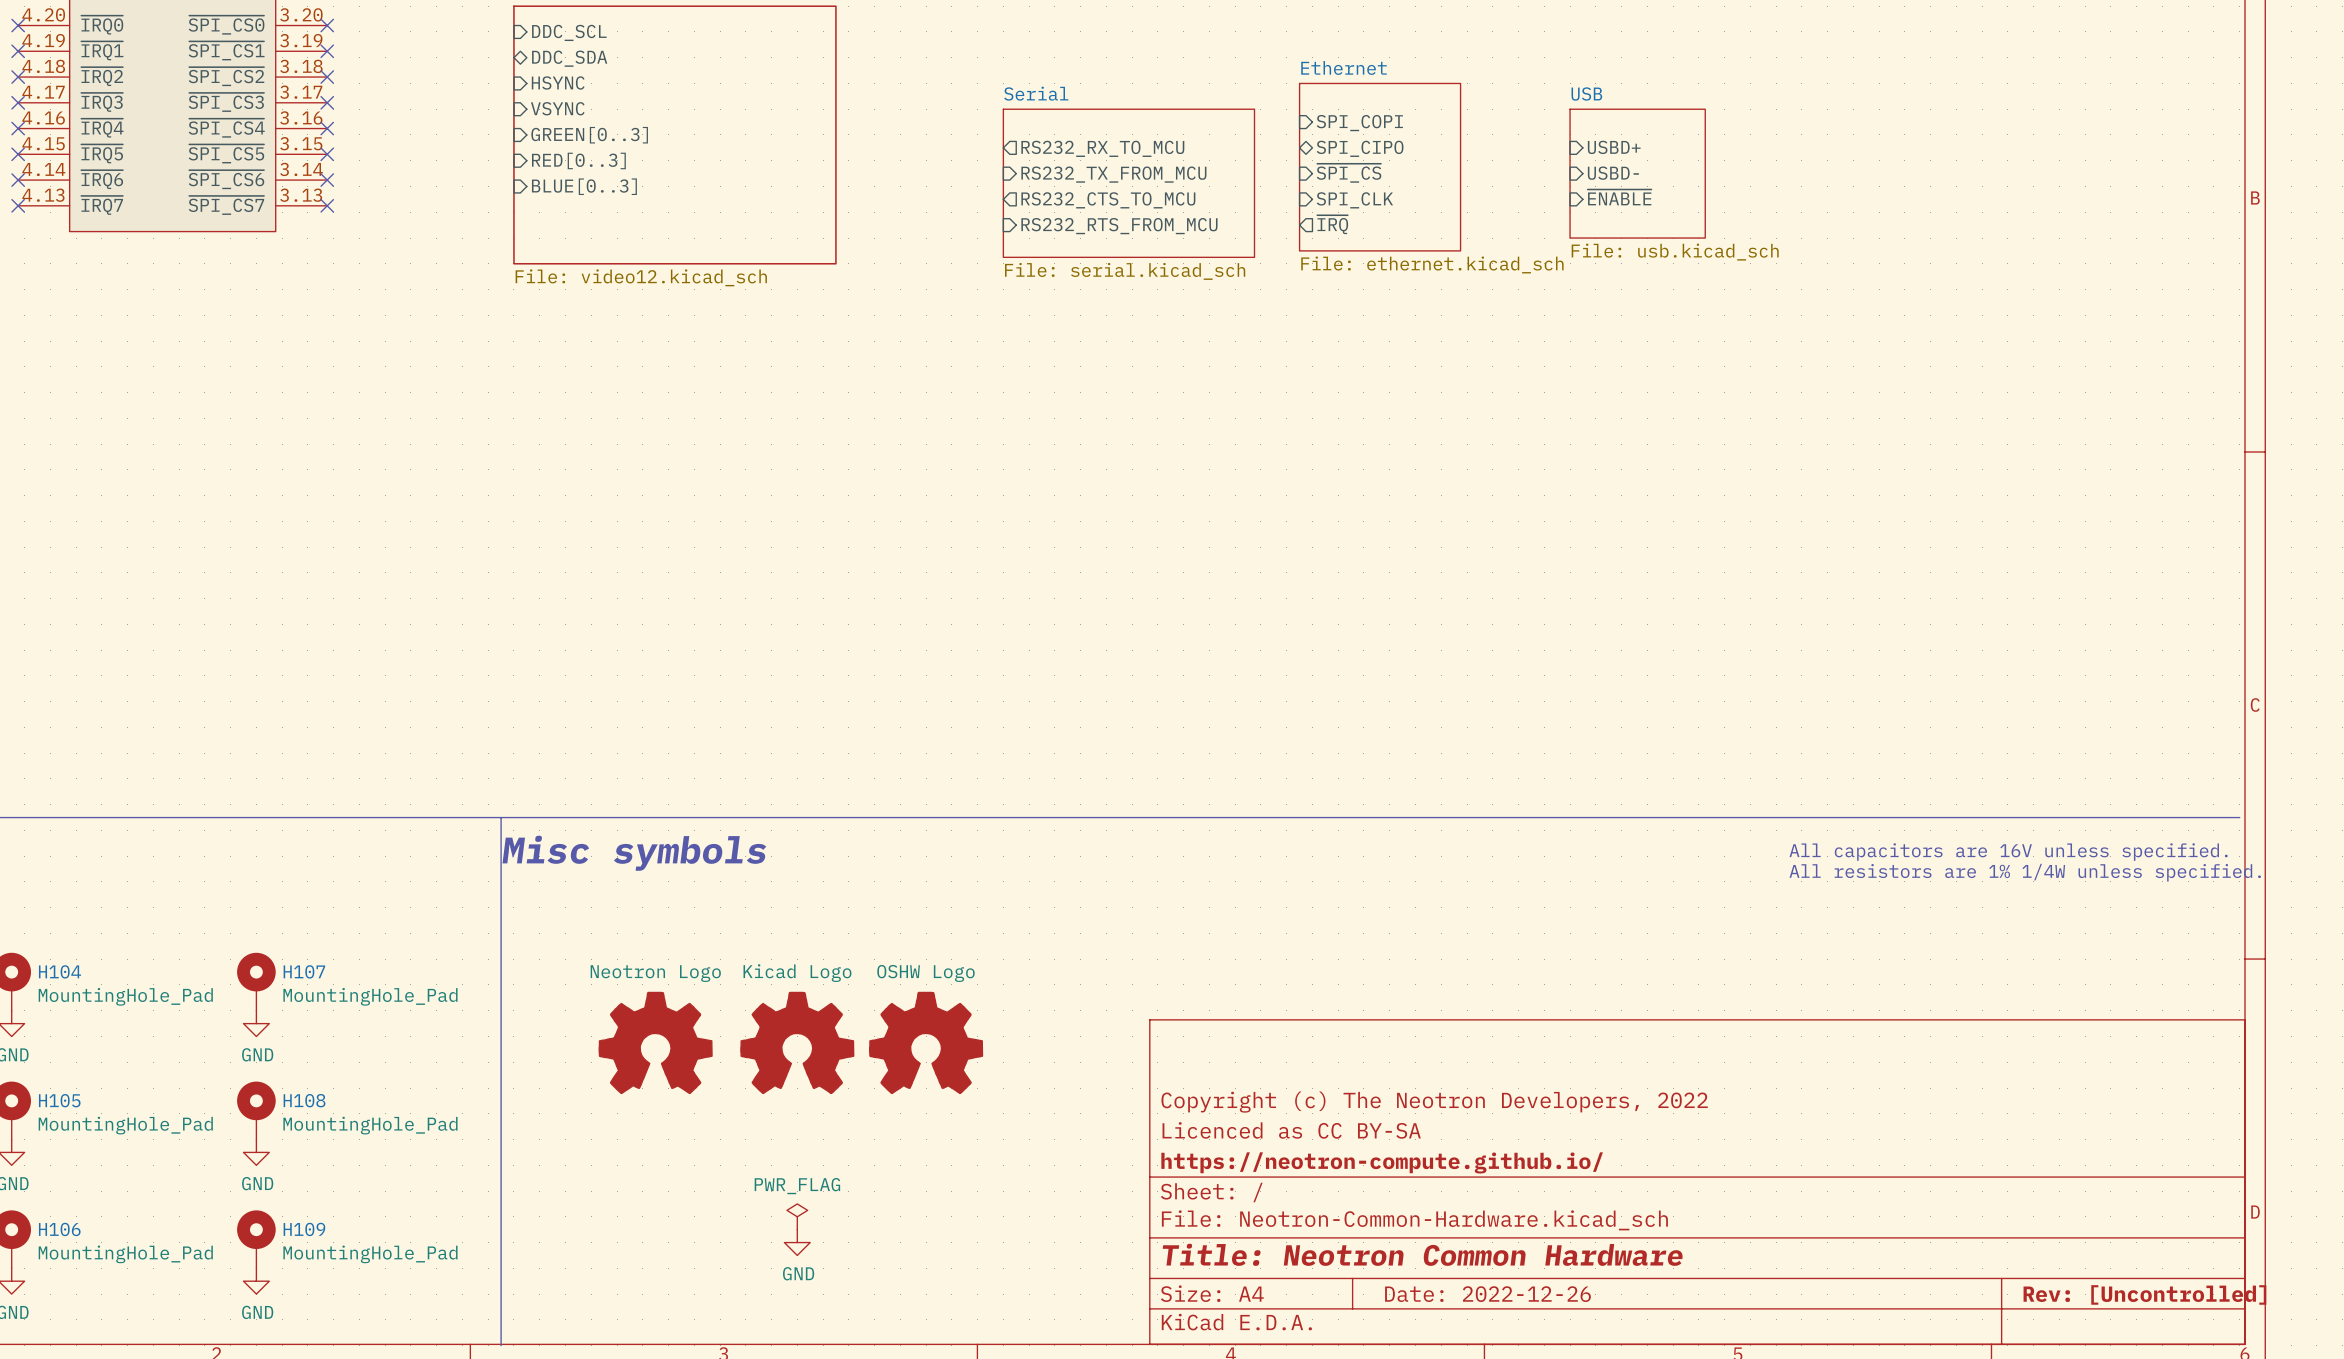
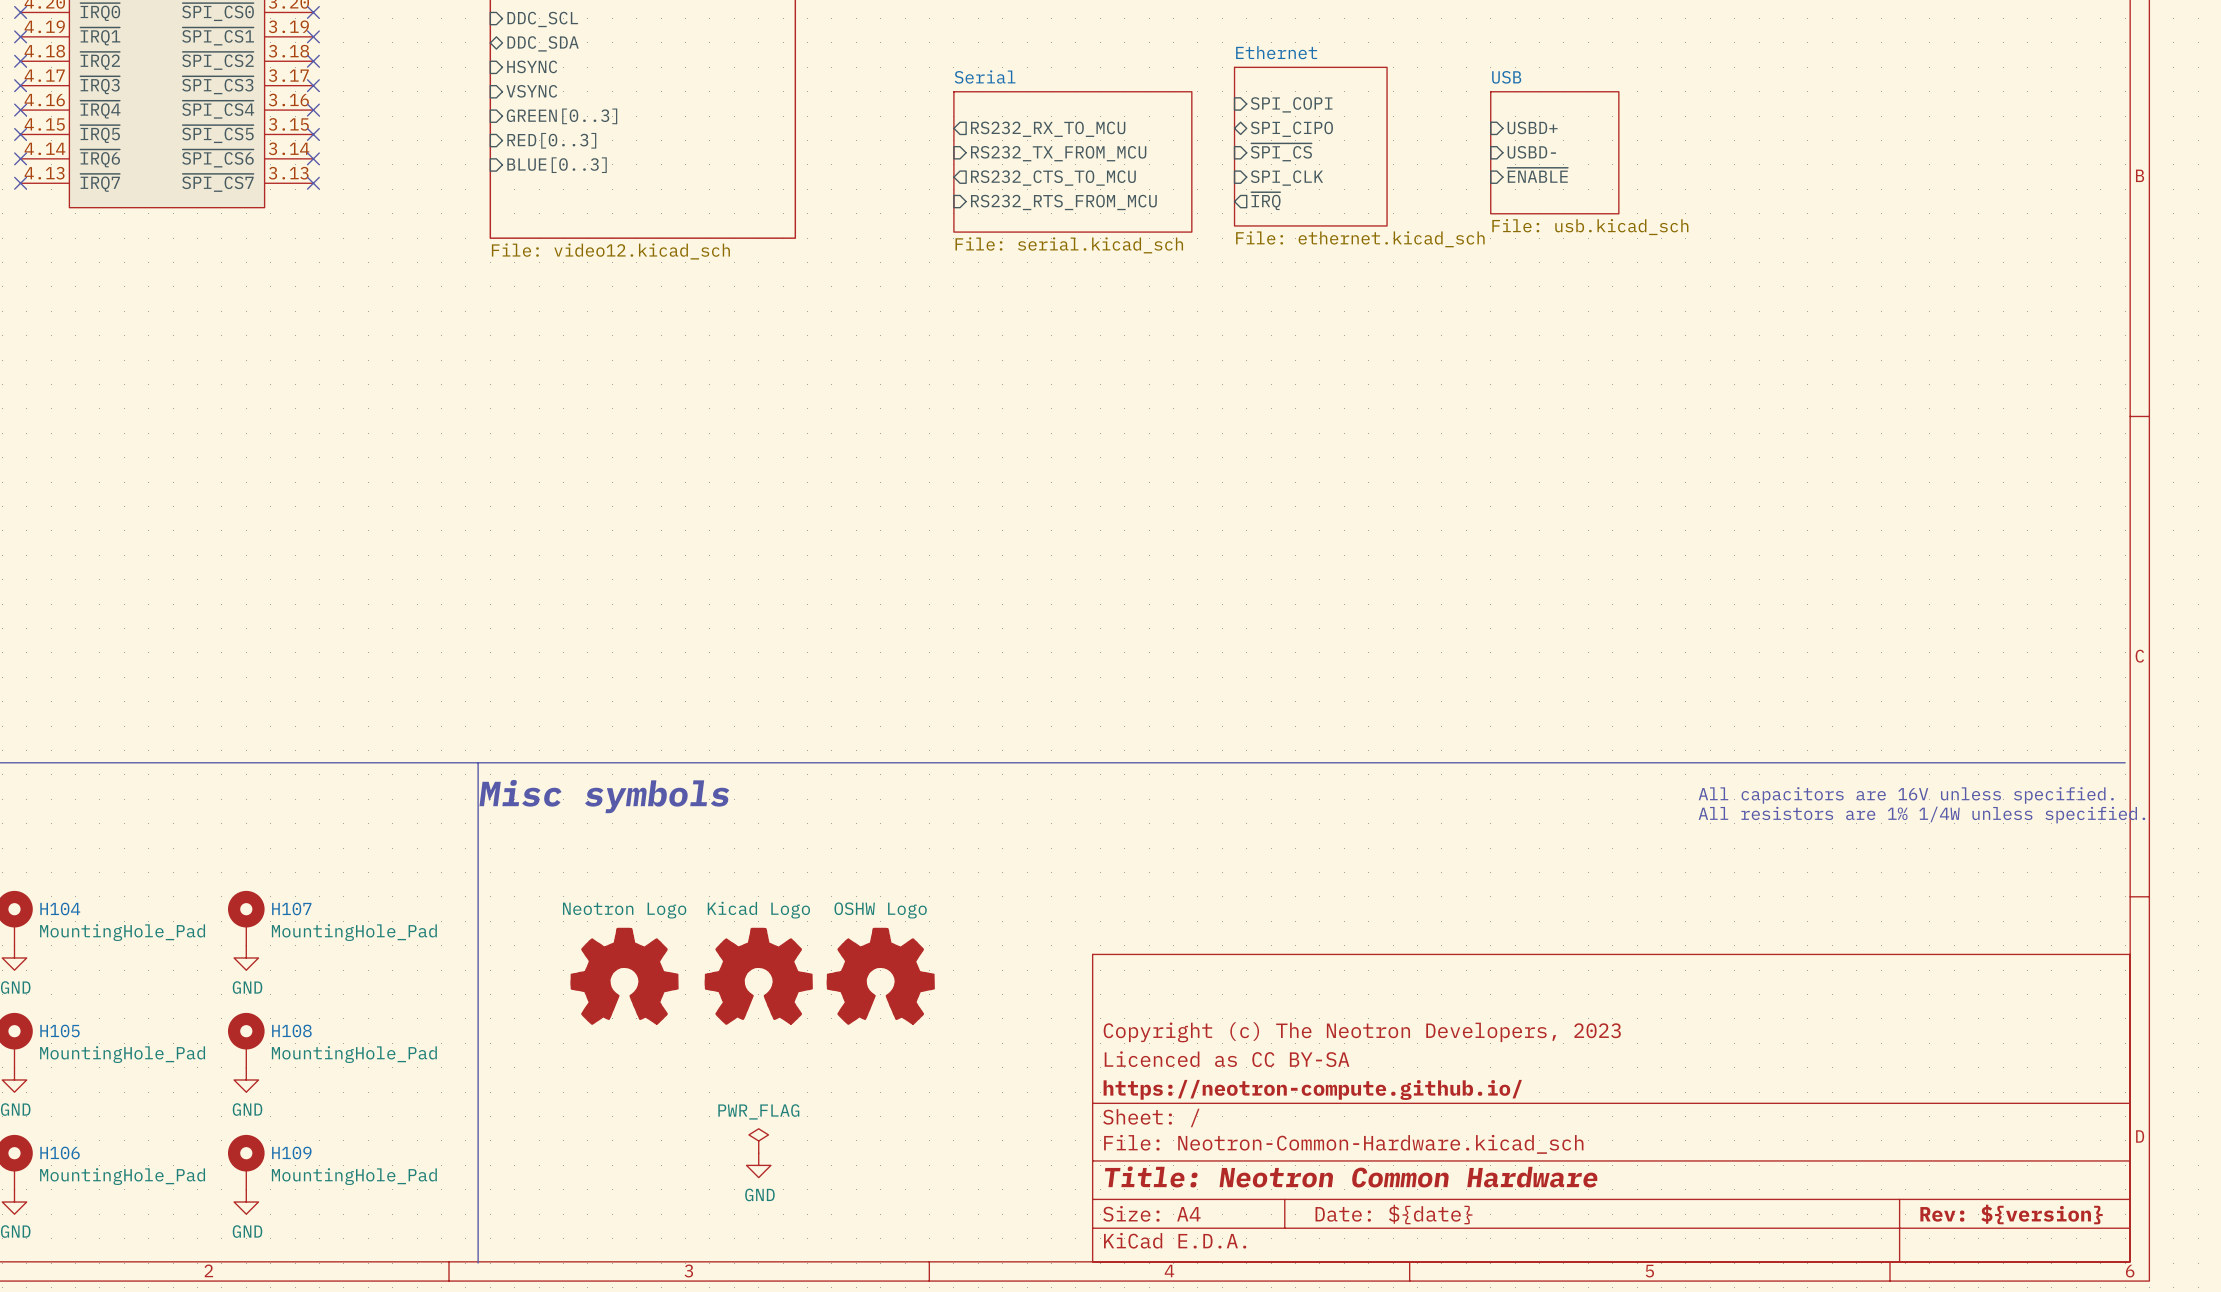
title block: Copyright (c) The Neotron Developers, 2022 (1434, 1102) -> Copyright (c) The Neotron Developers, 2023 (1362, 1032)
title block: Date: 2022-12-26 (1487, 1294) -> Date: ${date} (1394, 1214)
title block: Rev: [Uncontrolled] (2144, 1294) -> Rev: ${version} (2011, 1214)

